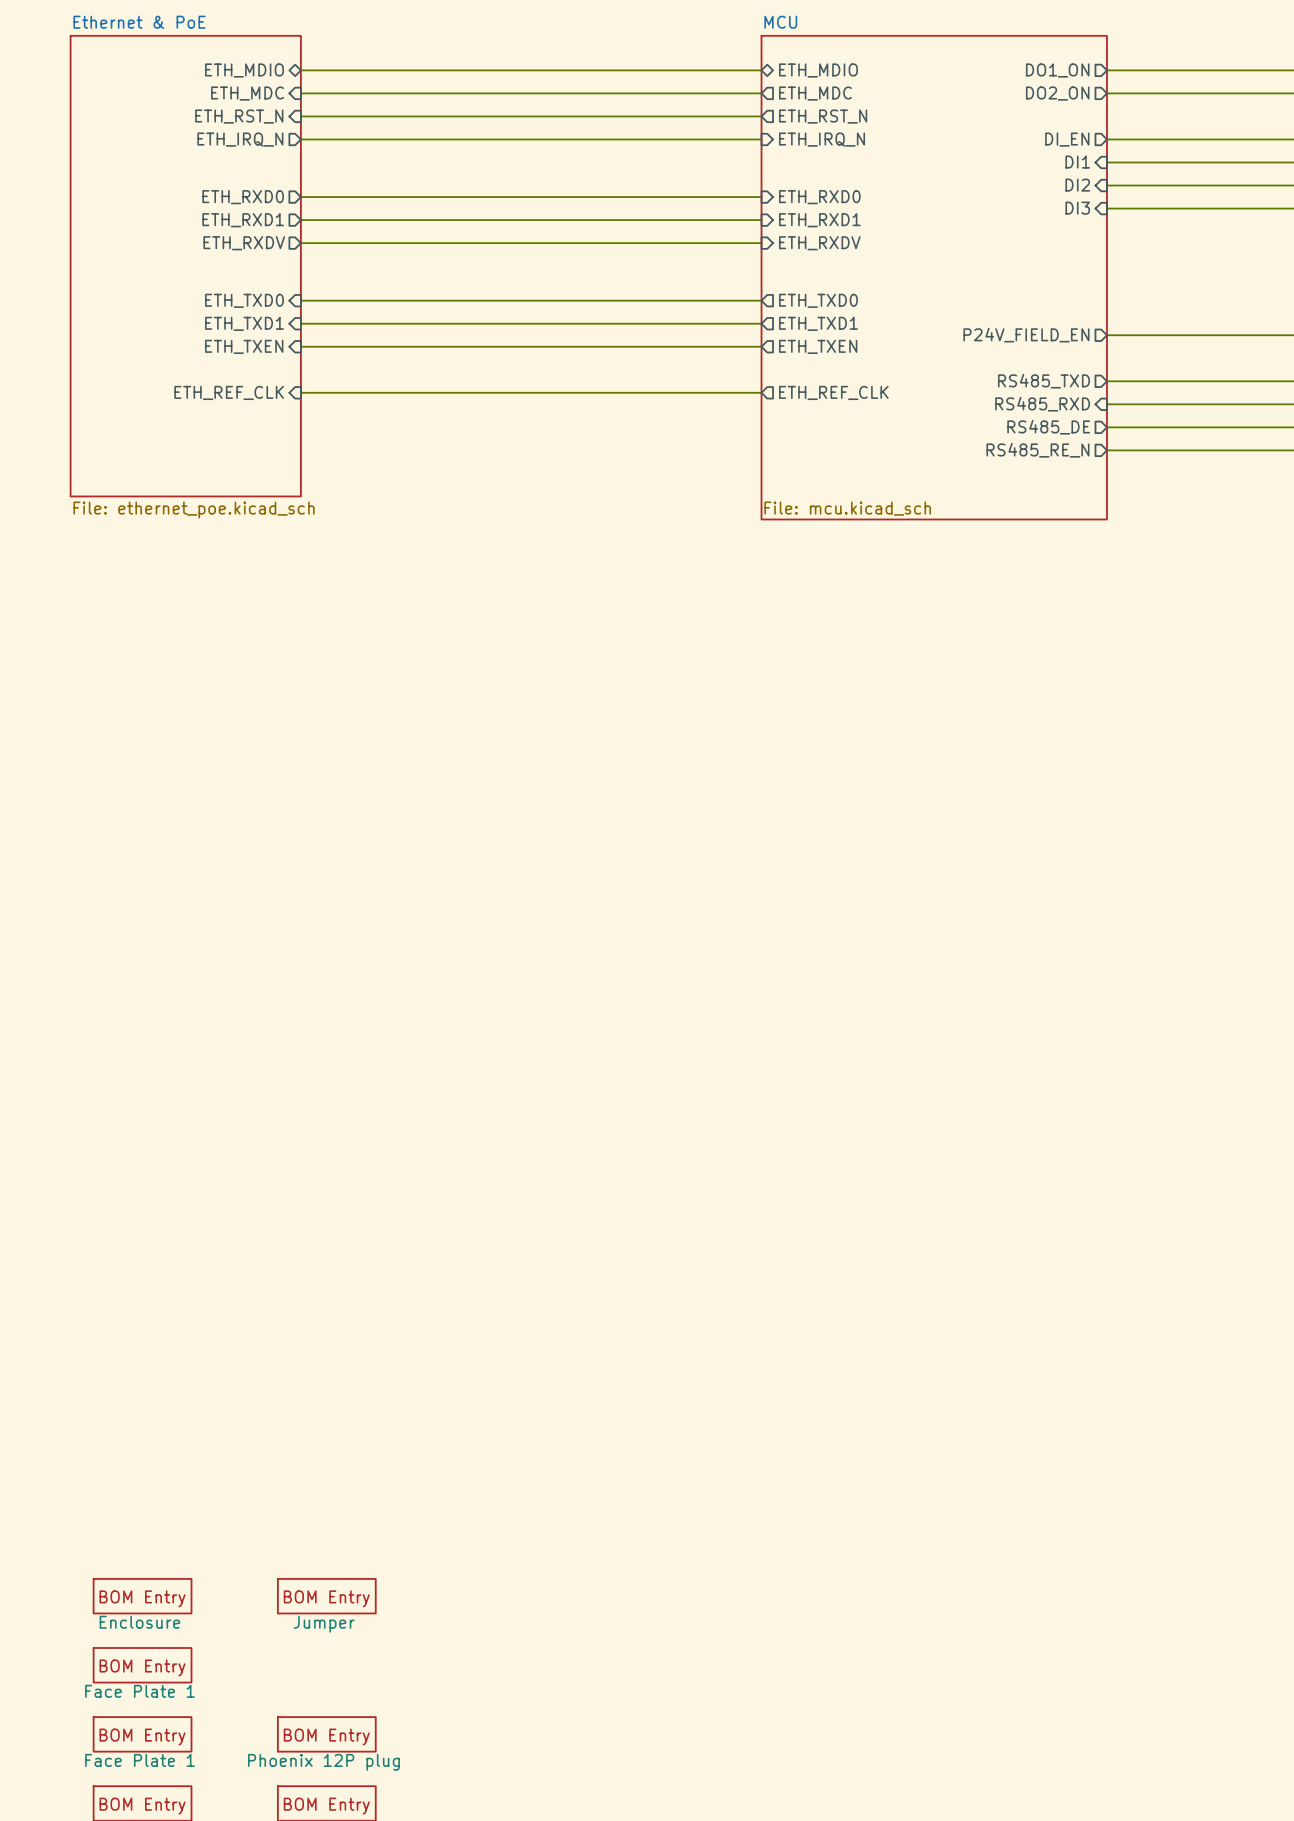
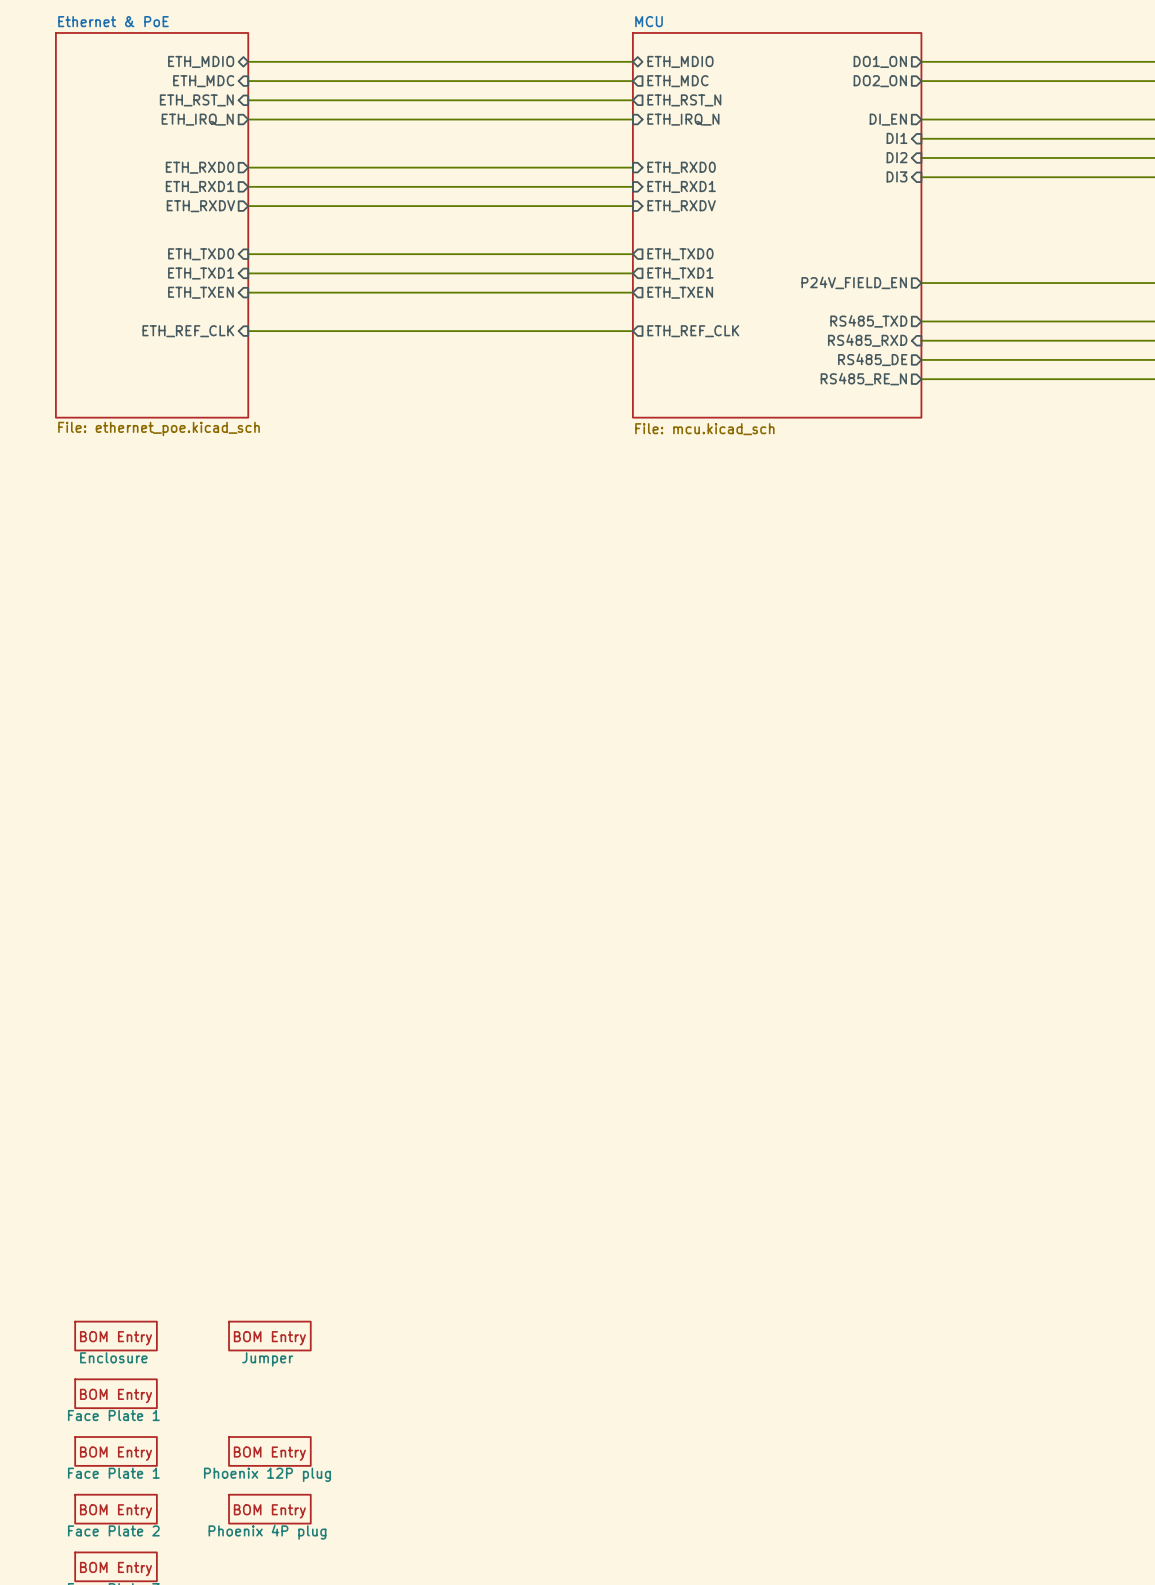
sheet MCU: none -> File: mcu.kicad_sch (777, 225)
sheet MCU: File: mcu.kicad_sch (934, 277) -> none

